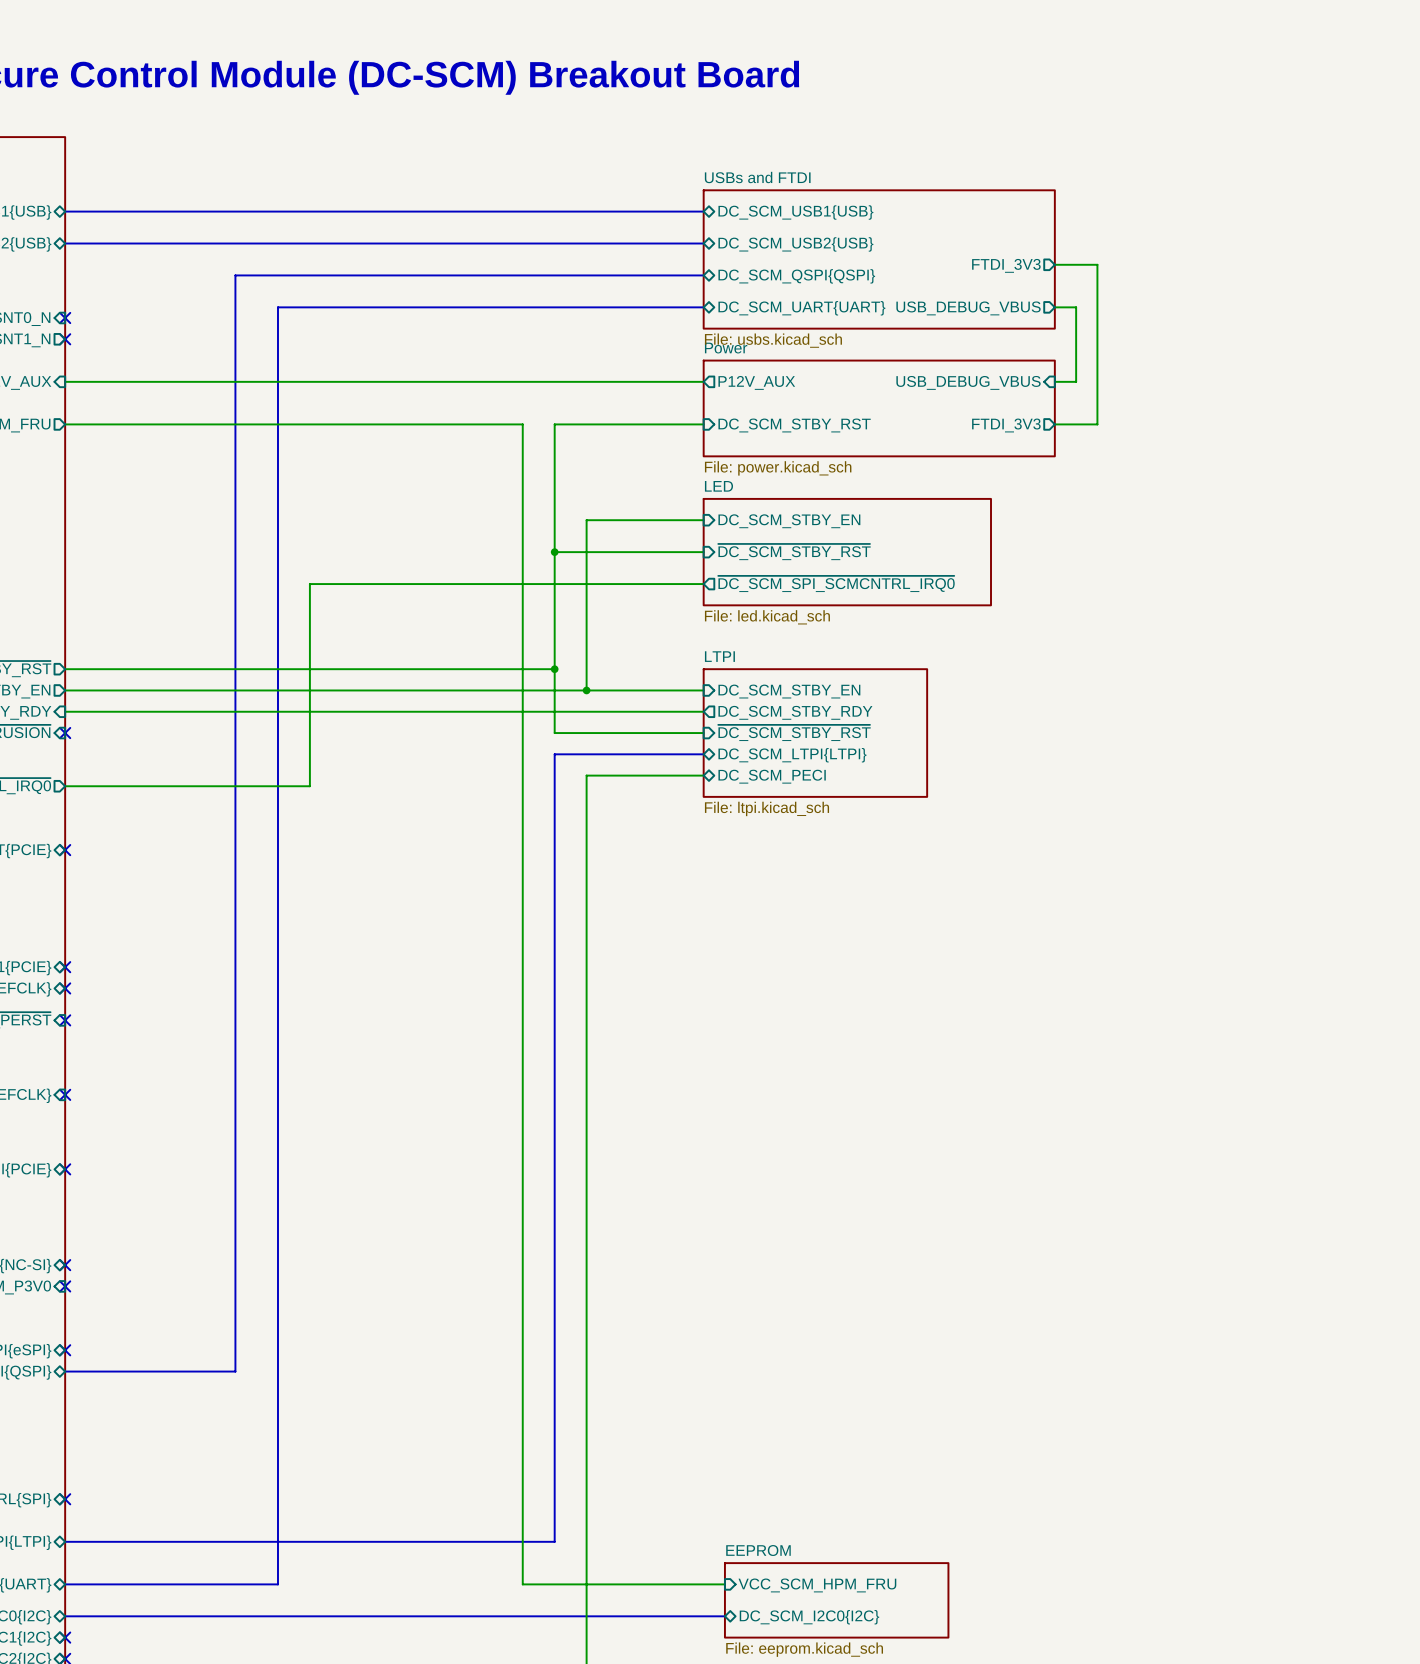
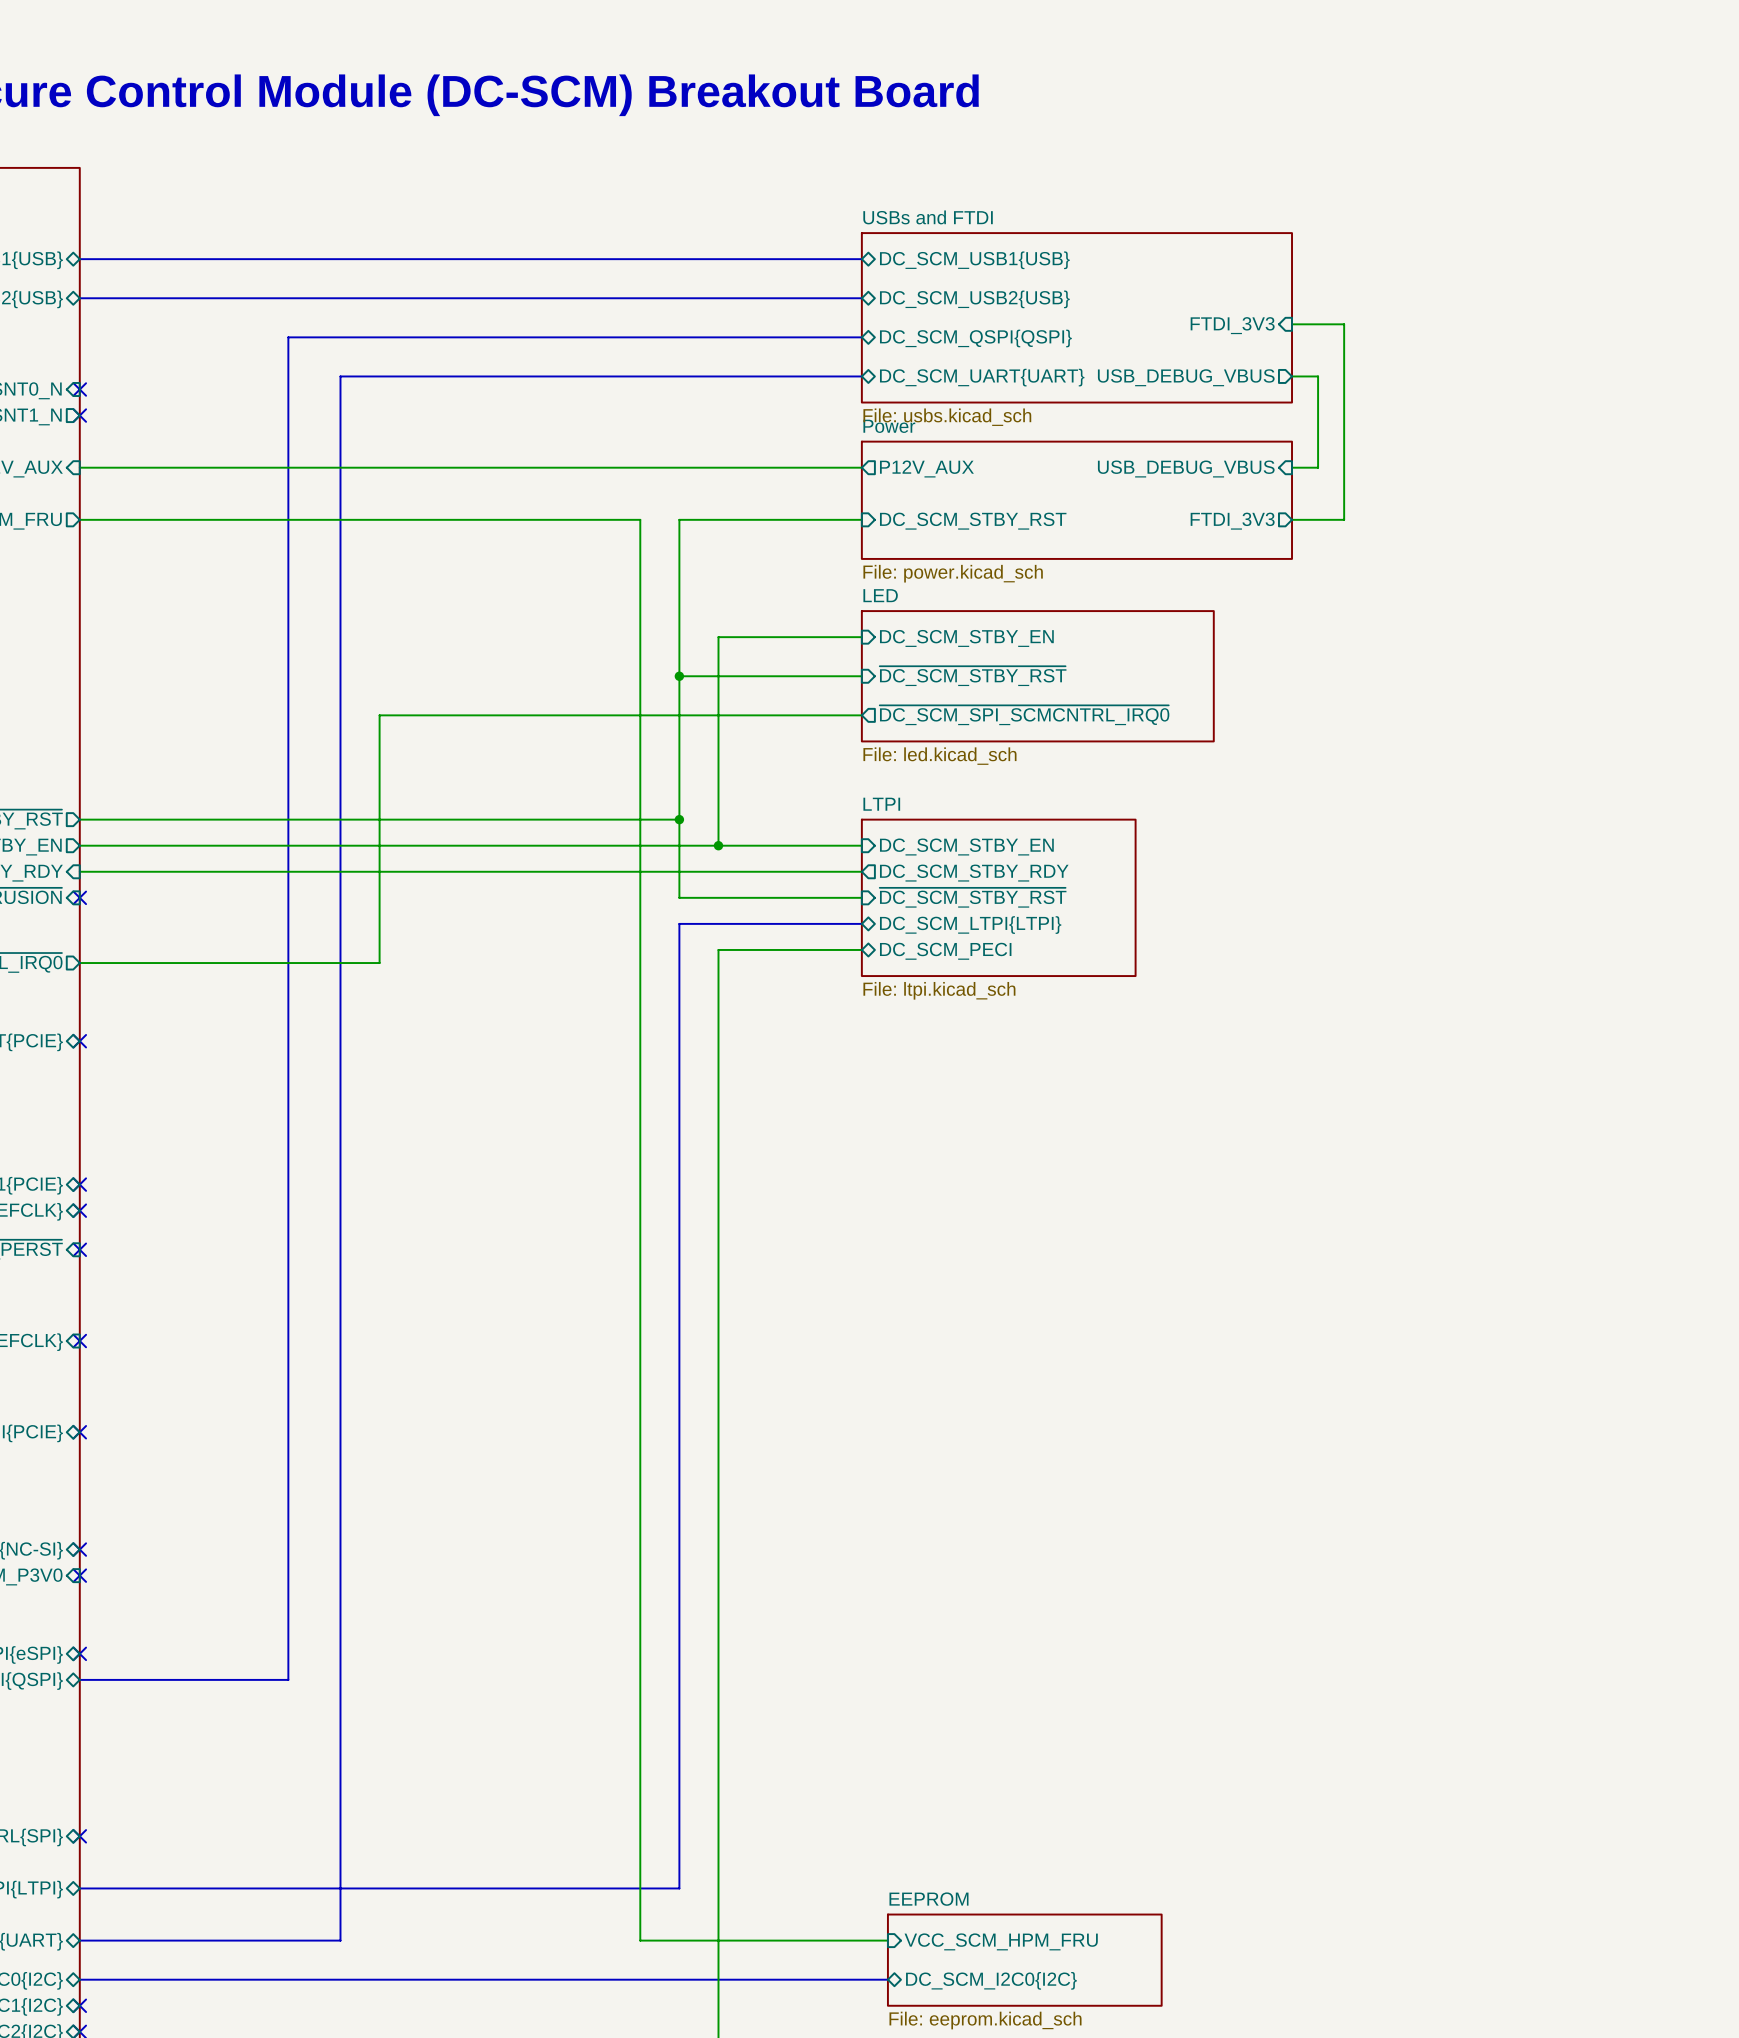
sheet pin shape: output (1006, 265) -> input (1232, 325)

